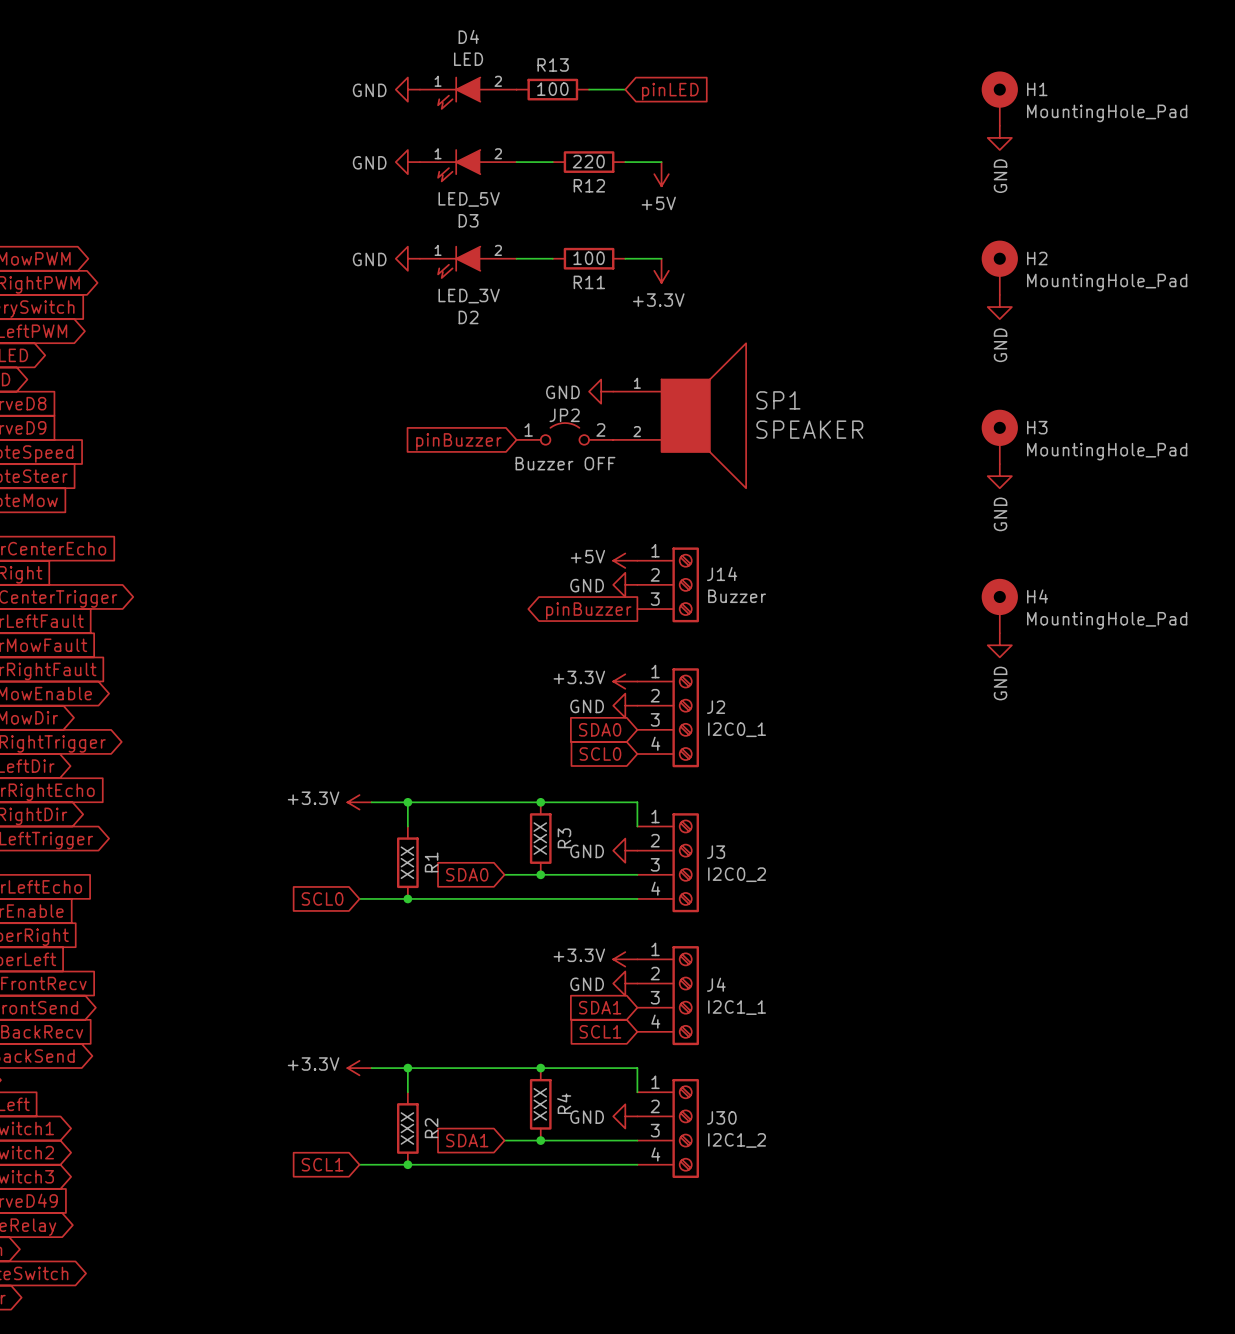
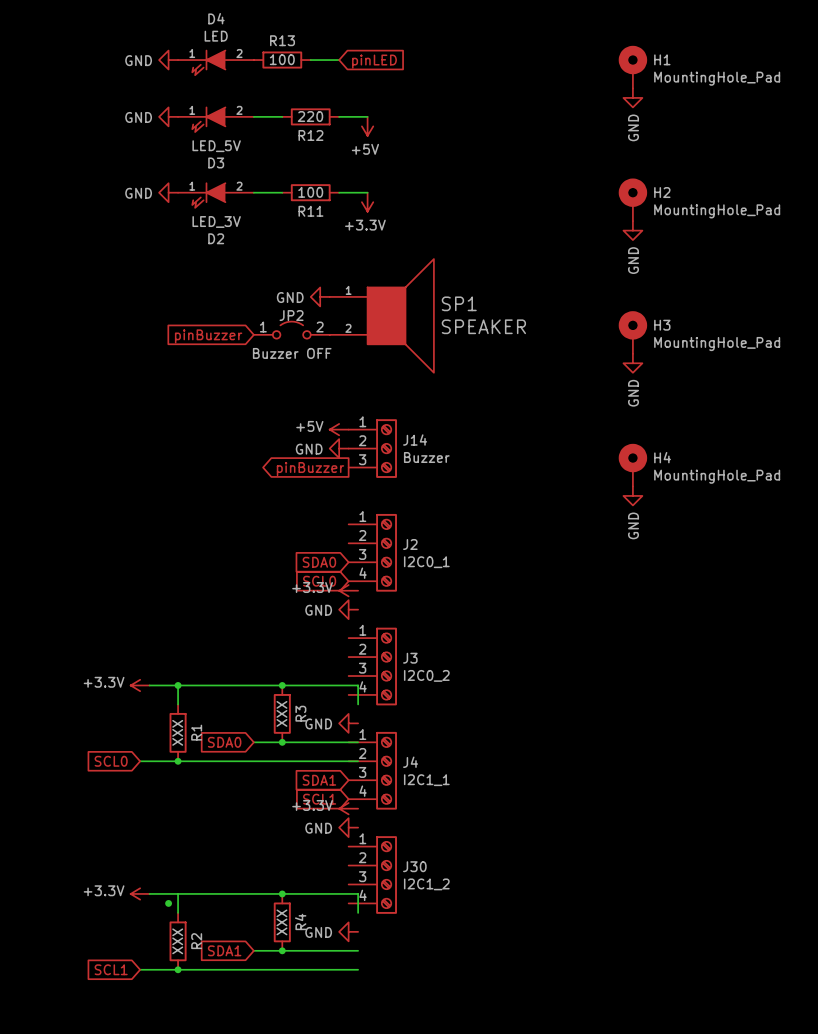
power symbol position: +3.3V (625, 681) -> +3.3V (348, 590)
power symbol: GND (625, 705) -> none
power symbol: none -> GND (348, 609)
power symbol position: +3.3V (359, 802) -> +3.3V (140, 685)
wire: (371, 802) (637, 802) (637, 826) -> (149, 685) (358, 685) (358, 704)
wire: (407, 802) (407, 826) -> (178, 685) (178, 704)
junction: (407, 802) -> none
junction: (540, 802) -> none
R3 position: (540, 838) -> (282, 713)
power symbol: GND (625, 850) -> none
R1 position: (407, 862) -> (178, 732)
global label position: SDA0 (467, 874) -> SDA0 (224, 742)
wire: (504, 874) (637, 874) -> (253, 742) (358, 742)
junction position: (540, 874) -> (282, 685)
global label position: SCL0 (322, 898) -> SCL0 (111, 761)
wire: (359, 898) (637, 898) -> (140, 761) (358, 761)
junction position: (407, 898) -> (178, 685)
power symbol: none -> GND (348, 723)
junction: none -> (282, 742)
power symbol position: +3.3V (625, 959) -> +3.3V (348, 808)
junction: none -> (178, 761)
power symbol: GND (625, 983) -> none
power symbol position: +3.3V (359, 1068) -> +3.3V (140, 893)
wire: (371, 1068) (637, 1068) (637, 1092) -> (149, 893) (358, 893) (358, 912)
wire: (407, 1068) (407, 1092) -> (178, 893) (178, 912)
junction: (407, 1068) -> none
junction: (540, 1068) -> none
power symbol: none -> GND (348, 827)
R4 position: (540, 1104) -> (282, 922)
power symbol: GND (625, 1116) -> none
R2 position: (407, 1128) -> (178, 941)
global label position: SDA1 (467, 1140) -> SDA1 (224, 950)
wire: (504, 1140) (637, 1140) -> (253, 950) (358, 950)
junction position: (540, 1140) -> (282, 893)
global label position: SCL1 (322, 1164) -> SCL1 (111, 969)
wire: (359, 1164) (637, 1164) -> (140, 969) (358, 969)
power symbol: none -> GND (348, 931)
junction: none -> (282, 950)
junction: none -> (178, 969)

